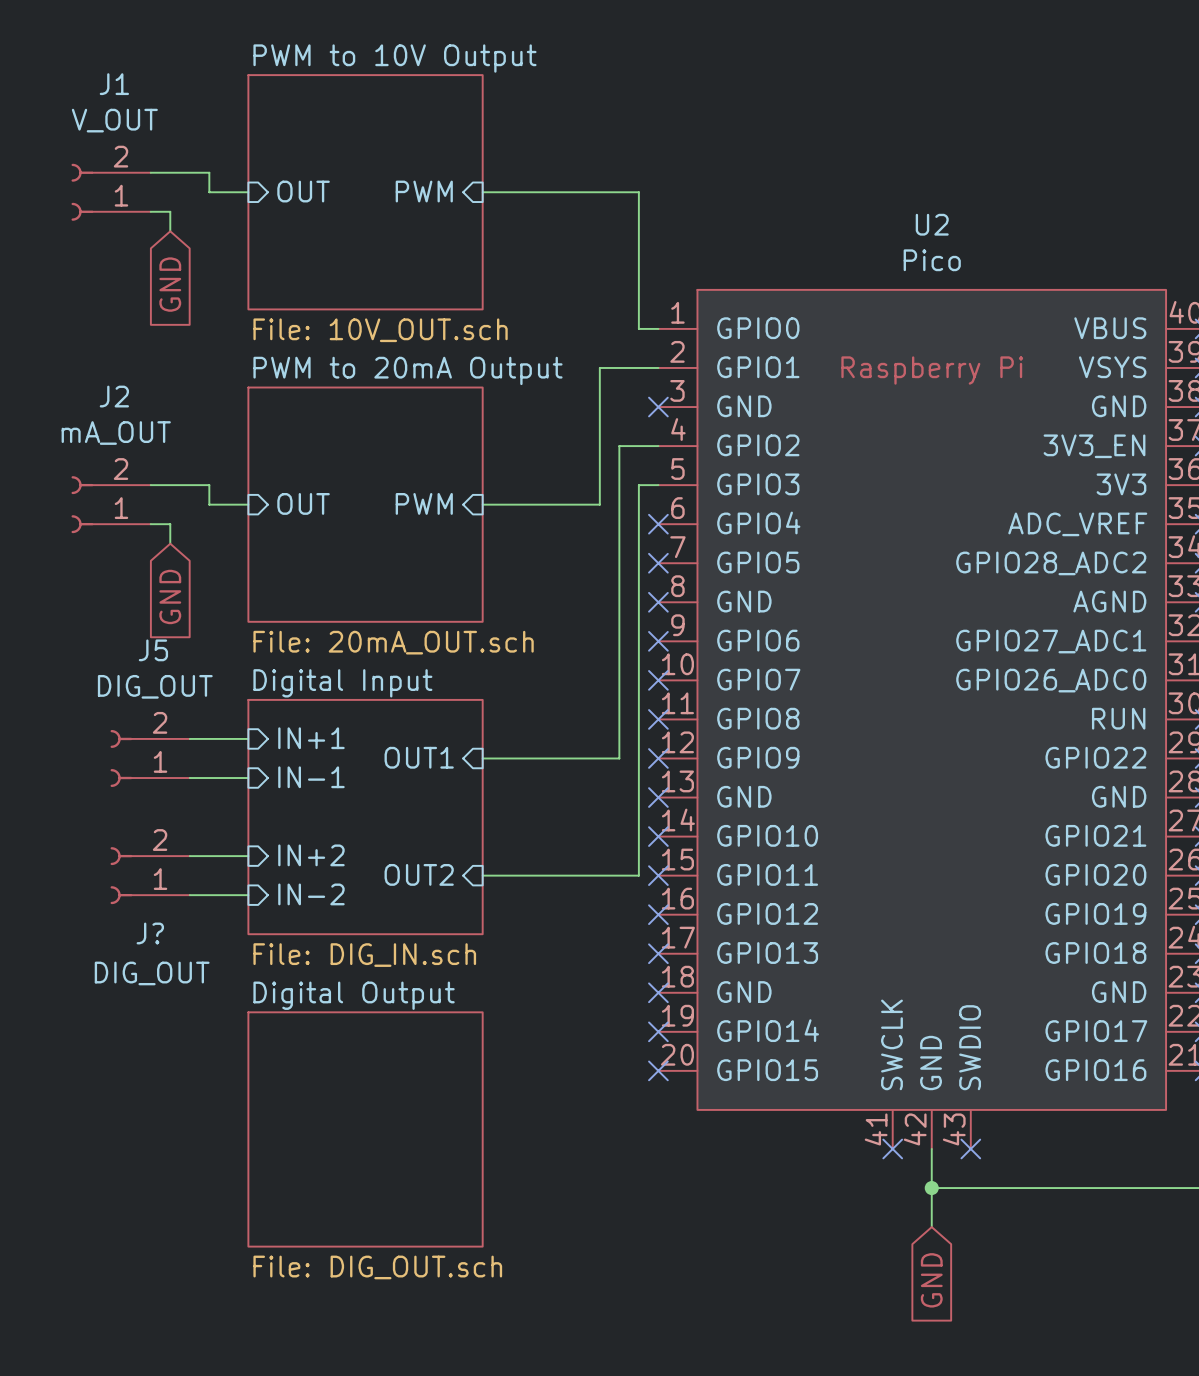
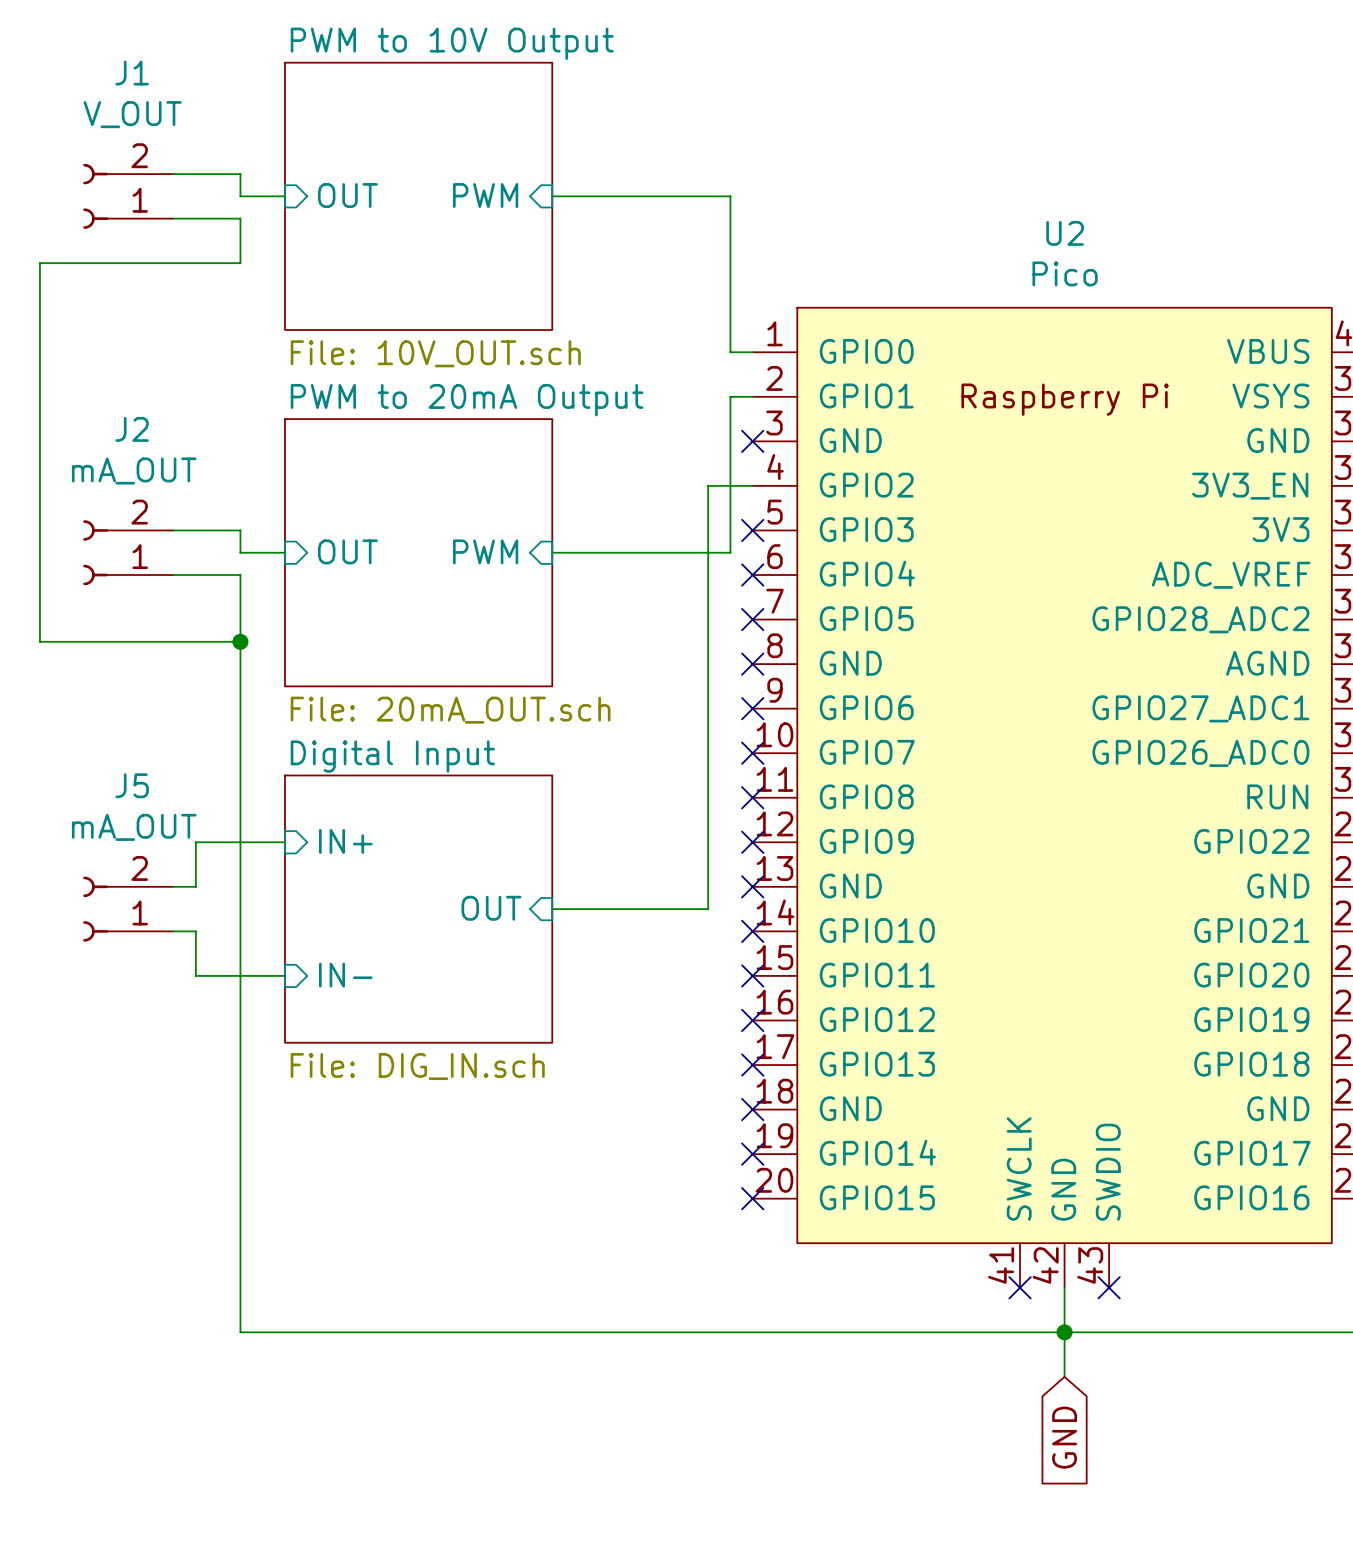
wire: (170, 211) (170, 231) -> (195, 218) (240, 218) (240, 263) (39, 263) (39, 641) (240, 641)
global label: GND (170, 284) -> none
wire: (638, 367) (599, 367) (599, 504) -> (730, 396) (730, 530)
wire: (638, 485) (658, 485) -> none
no-connect mark: none -> (752, 530)
wire: (638, 504) (638, 875) (482, 875) -> (730, 552) (685, 552)
wire: (170, 524) (170, 543) -> (195, 575) (240, 575) (240, 1332) (1064, 1332)
junction: none -> (240, 641)
global label: GND (170, 596) -> none
J5 value: DIG_OUT (155, 686) -> mA_OUT (134, 827)
wire: (189, 738) (248, 738) -> none
sheet pin: IN+1 (311, 738) -> IN+ (345, 841)
sheet pin: OUT1 (419, 757) -> none
J5 position: (150, 758) -> (128, 909)
wire: none -> (284, 842) (195, 842) (195, 886) (173, 886)
wire: (482, 758) (619, 758) -> (552, 909) (708, 909) (708, 842)
sheet pin: IN-1 (311, 777) -> none
wire: (189, 778) (248, 778) -> none
sheet pin: none -> OUT (491, 908)
wire: none -> (173, 931) (195, 931) (195, 975) (284, 975)
sheet pin: IN+2 (311, 855) -> none
wire: (189, 856) (248, 856) -> none
sheet pin: OUT2 (419, 874) -> none
J?: DIG_OUT (150, 875) -> none
sheet pin: IN-2 (311, 894) -> IN- (345, 975)
wire: (189, 895) (248, 895) -> none
sheet Digital Output: File: DIG_OUT.sch (365, 1129) -> none

